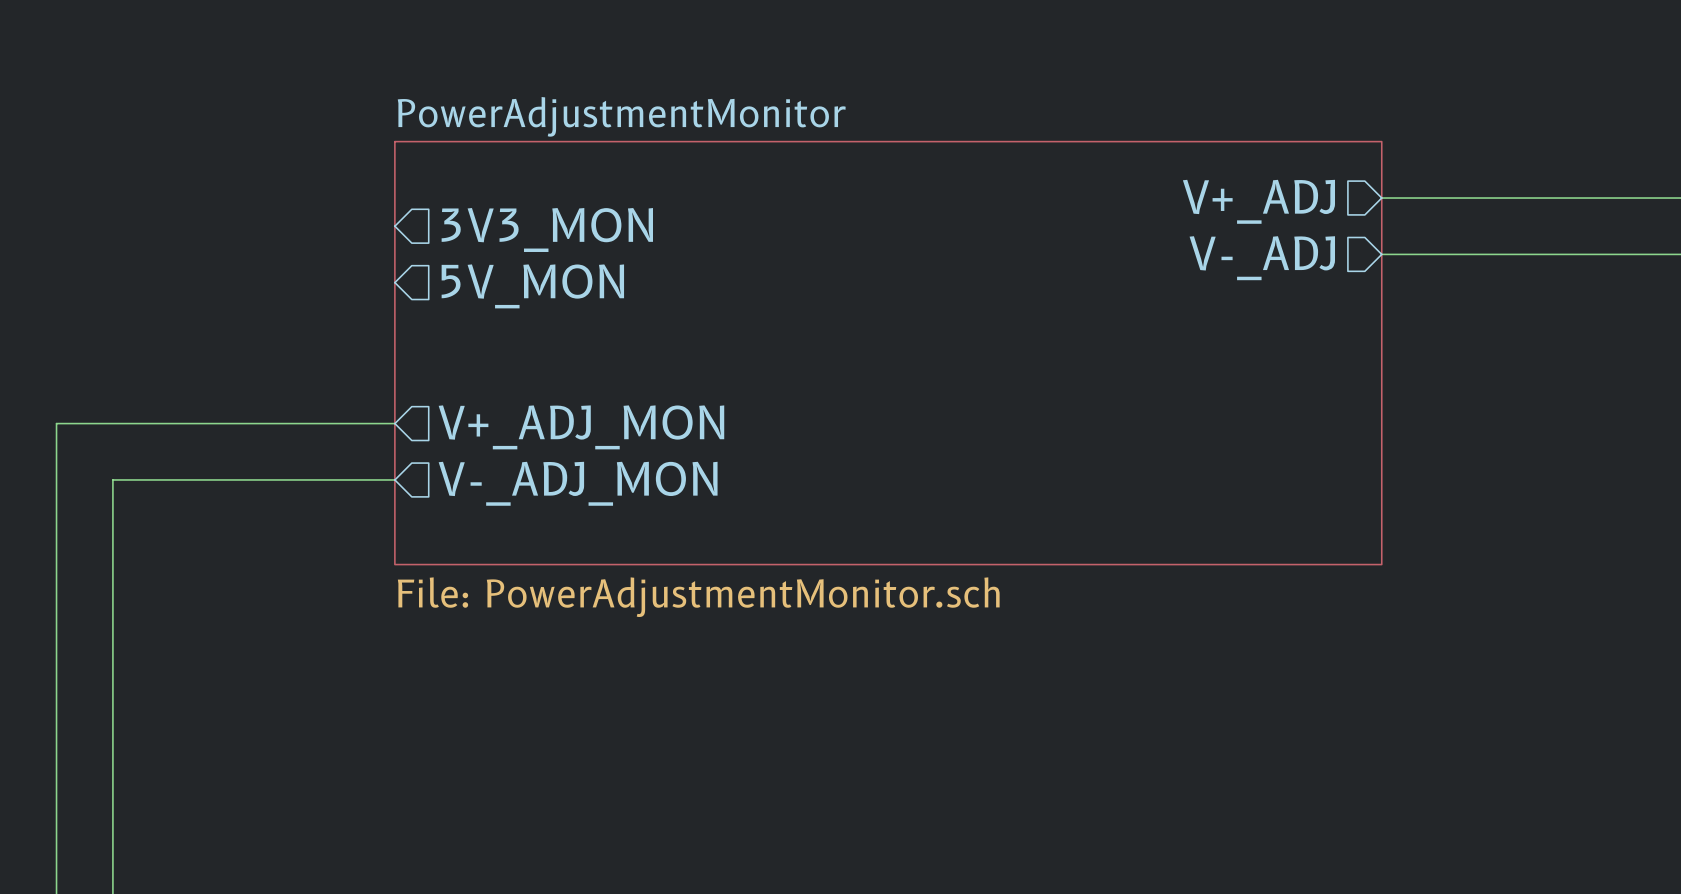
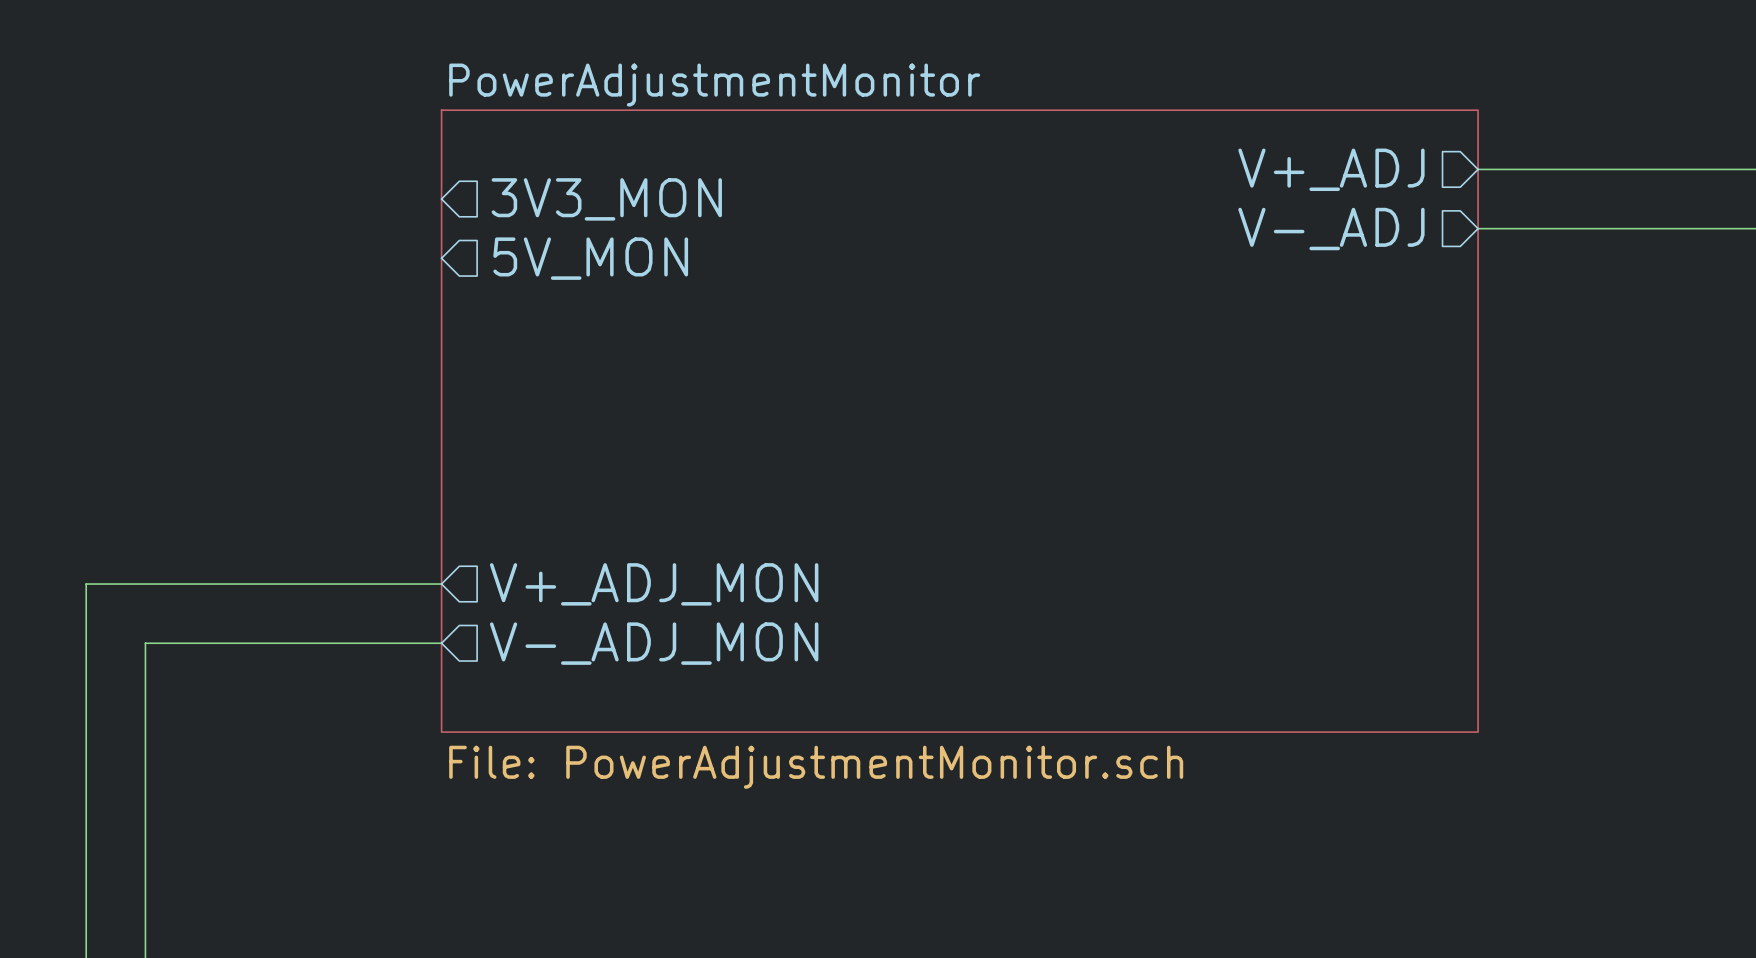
sheet PowerAdjustmentMonitor: File: PowerAdjustmentMonitor.sch (888, 353) -> none
wire: (394, 423) (56, 423) (56, 592) -> (441, 584) (86, 584)
sheet pin position: V+_ADJ_MON (581, 427) -> V+_ADJ_MON (654, 584)
sheet PowerAdjustmentMonitor: none -> File: PowerAdjustmentMonitor.sch (959, 421)
wire: (394, 479) (112, 479) (112, 649) -> (441, 643) (145, 643)
sheet pin position: V-_ADJ_MON (578, 483) -> V-_ADJ_MON (654, 643)

